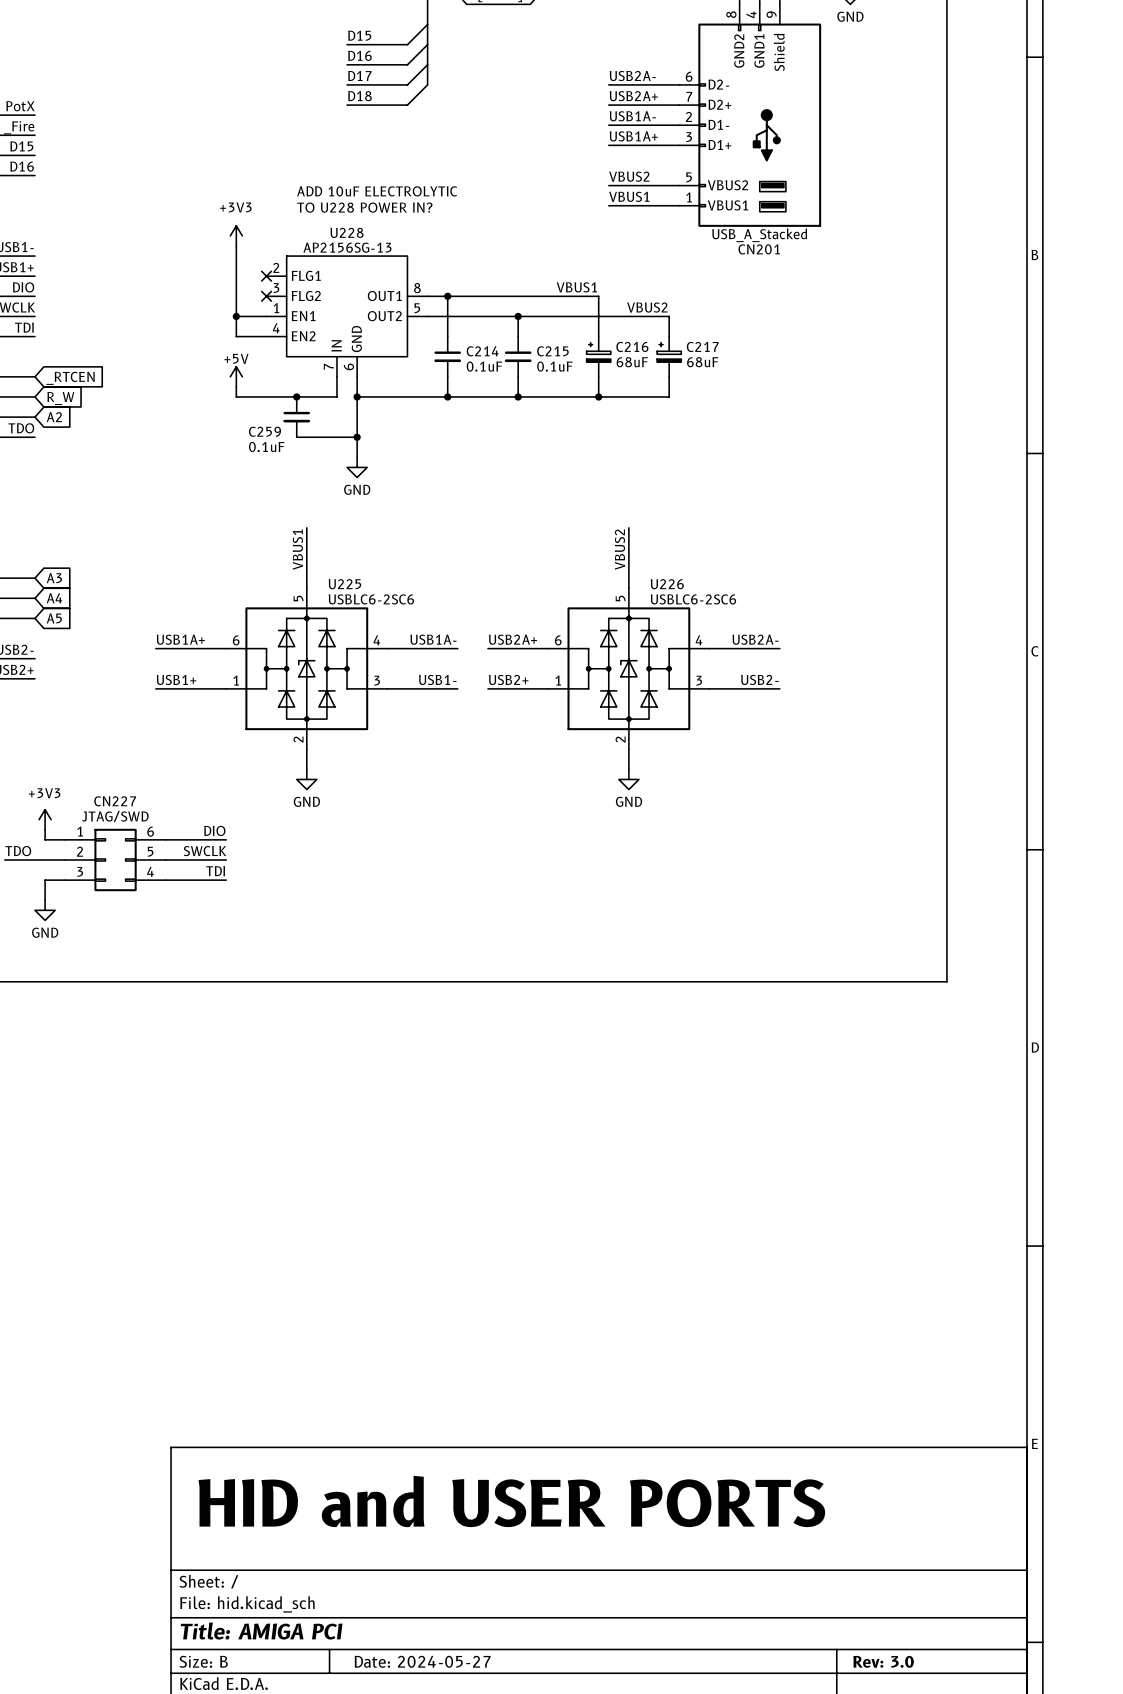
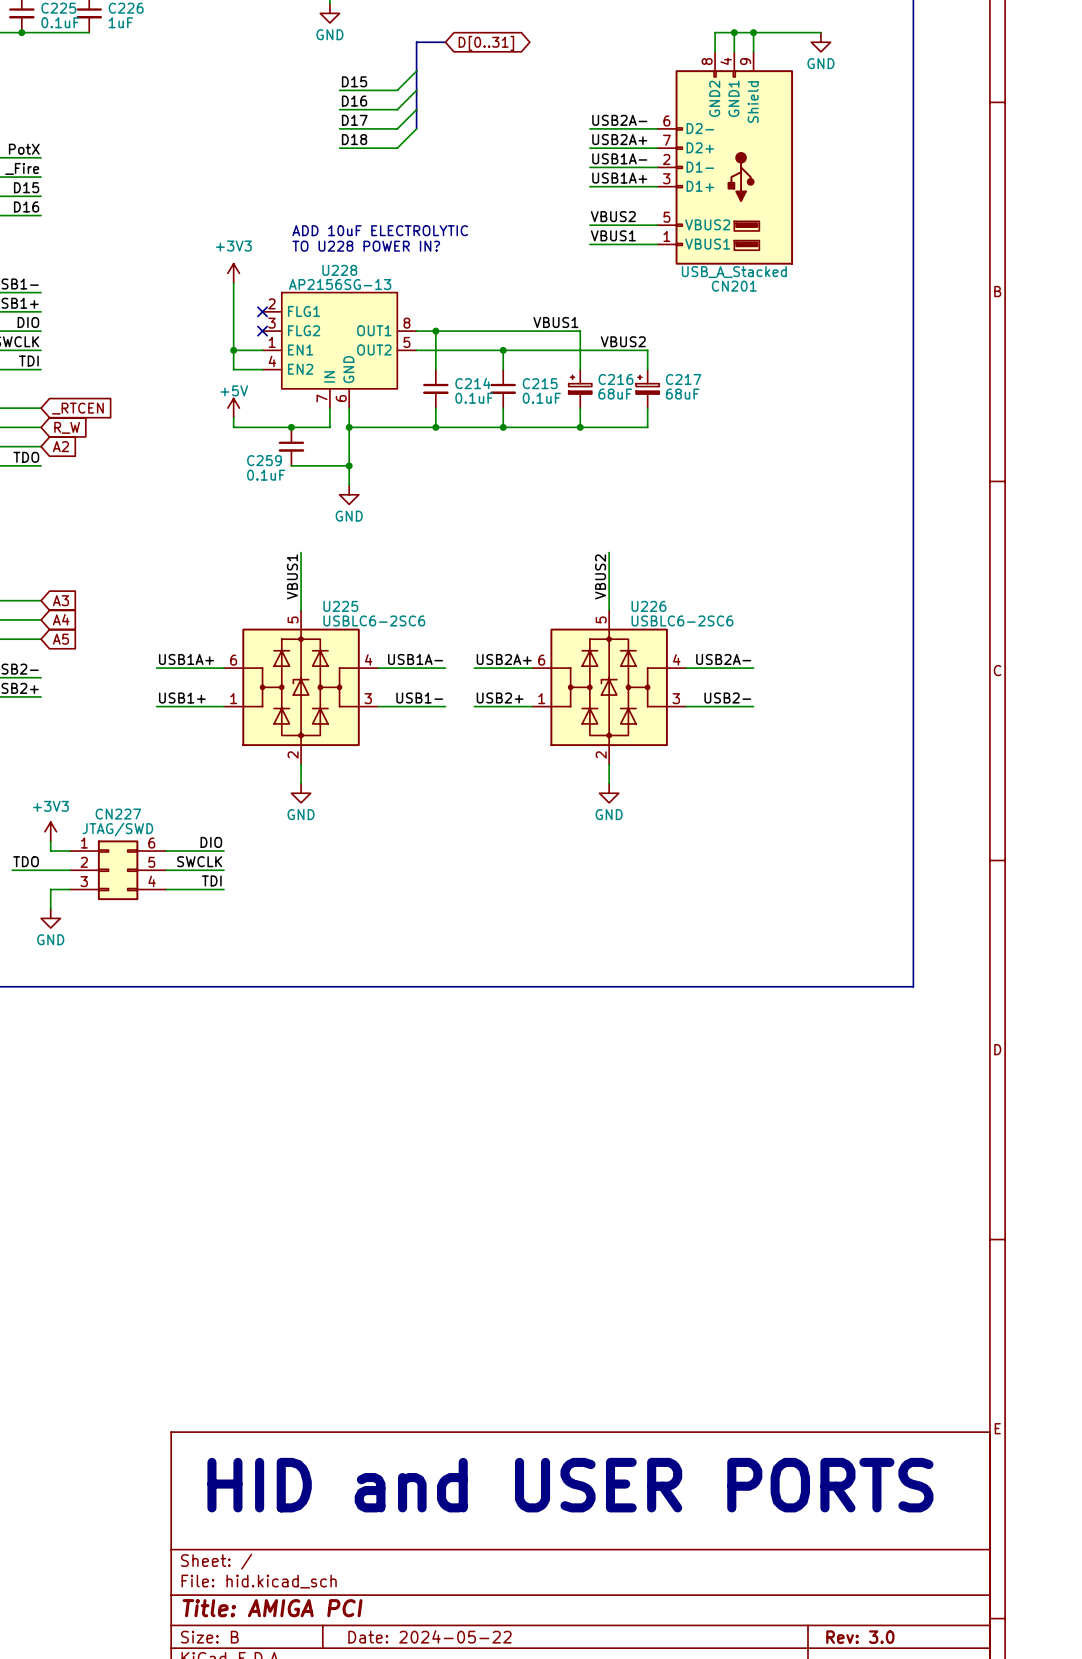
title block: Date: 2024-05-27 (422, 1661) -> Date: 2024-05-22 (429, 1636)

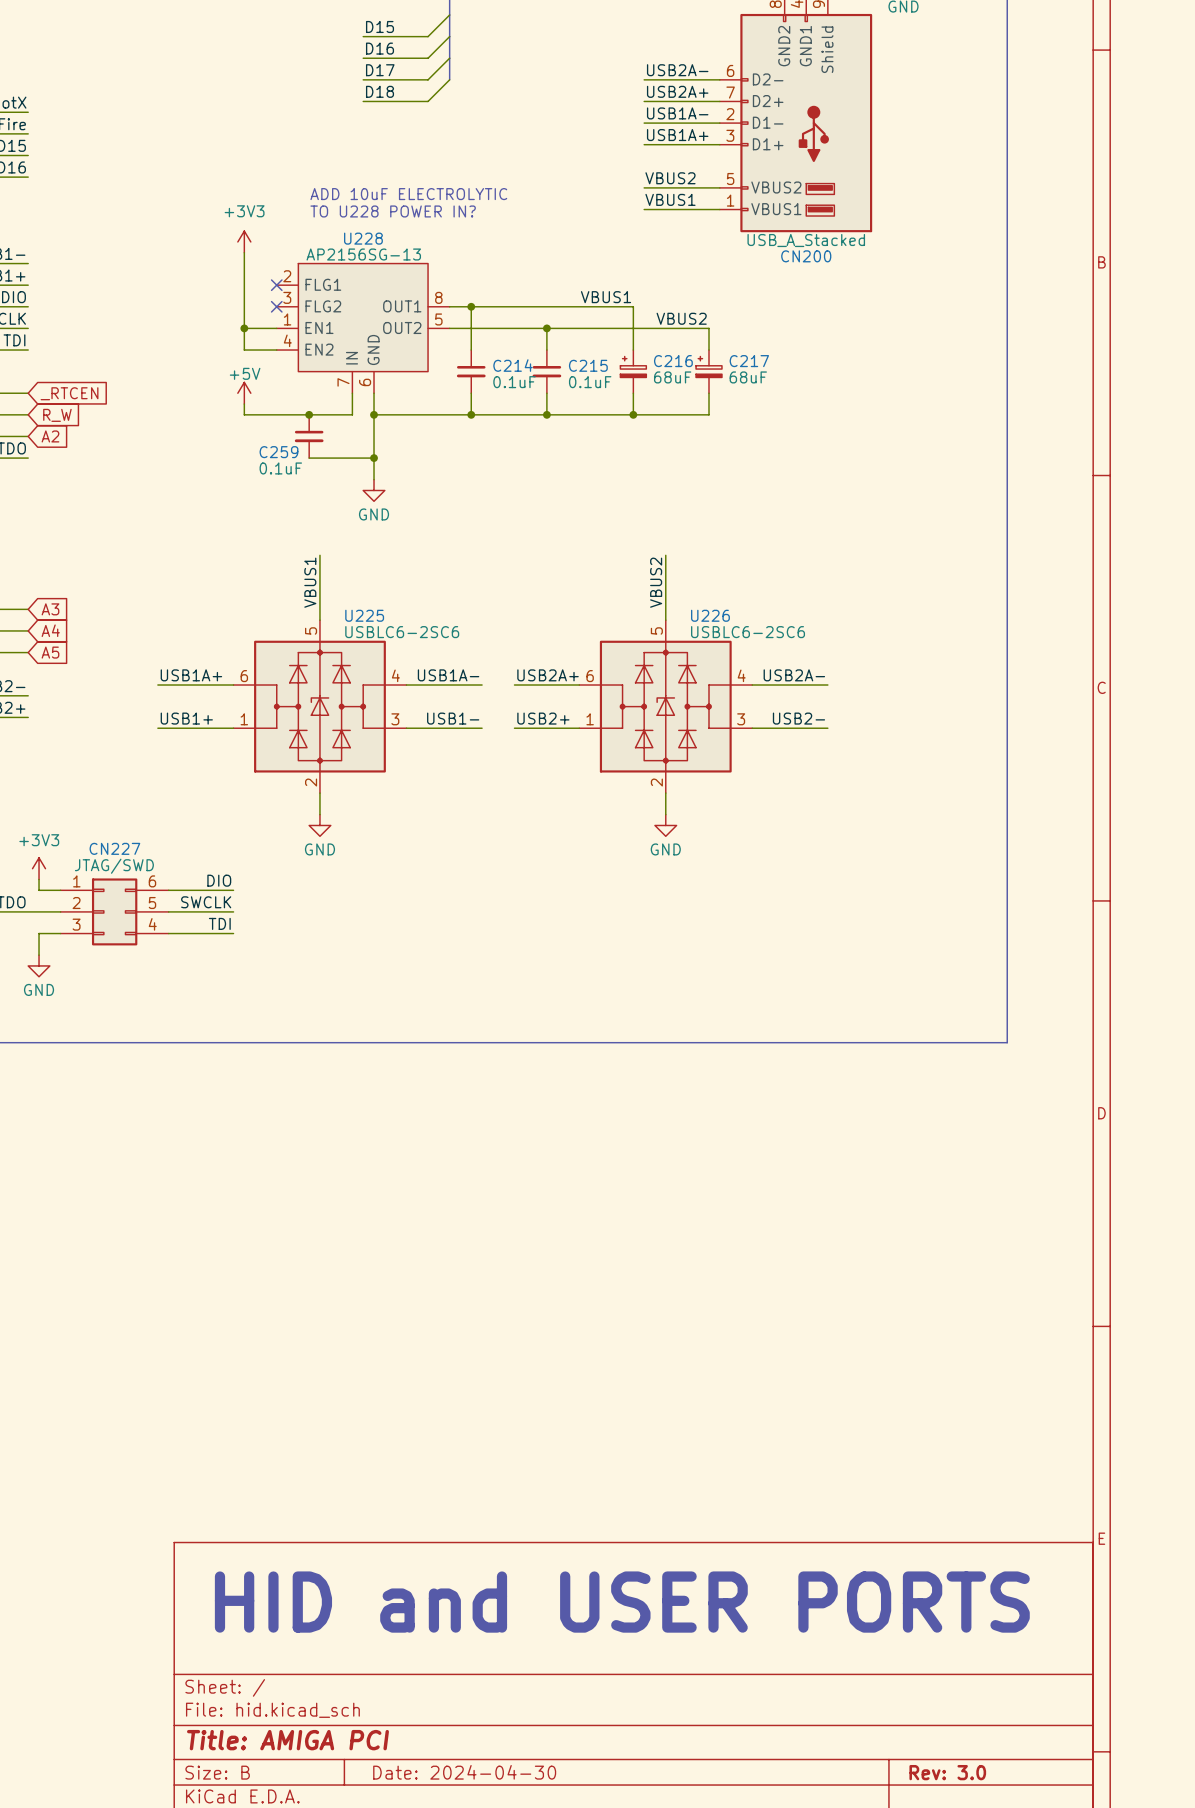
CN201 name: CN201 (734, 286) -> CN200 (806, 256)
title block: Date: 2024-05-22 (429, 1636) -> Date: 2024-04-30 (464, 1772)

